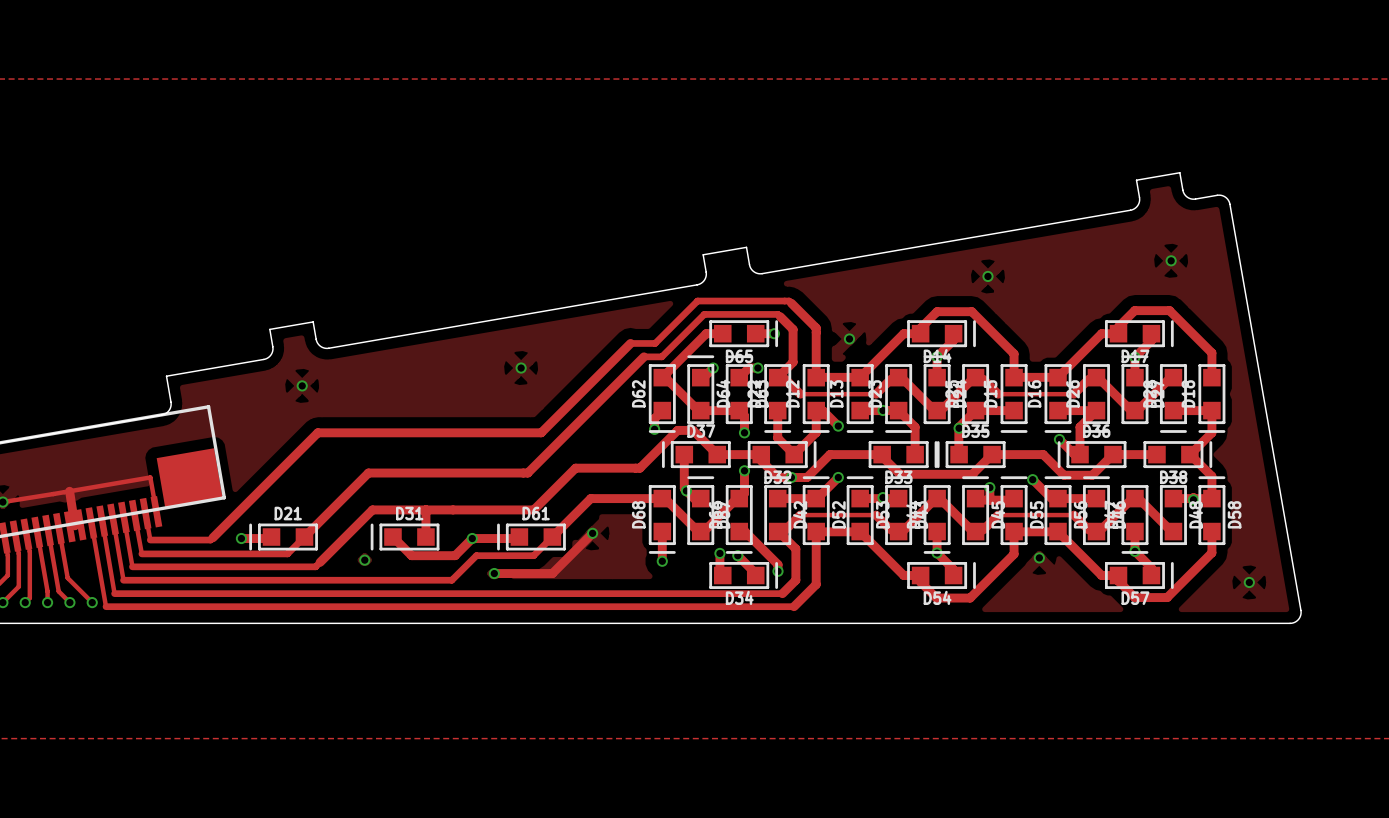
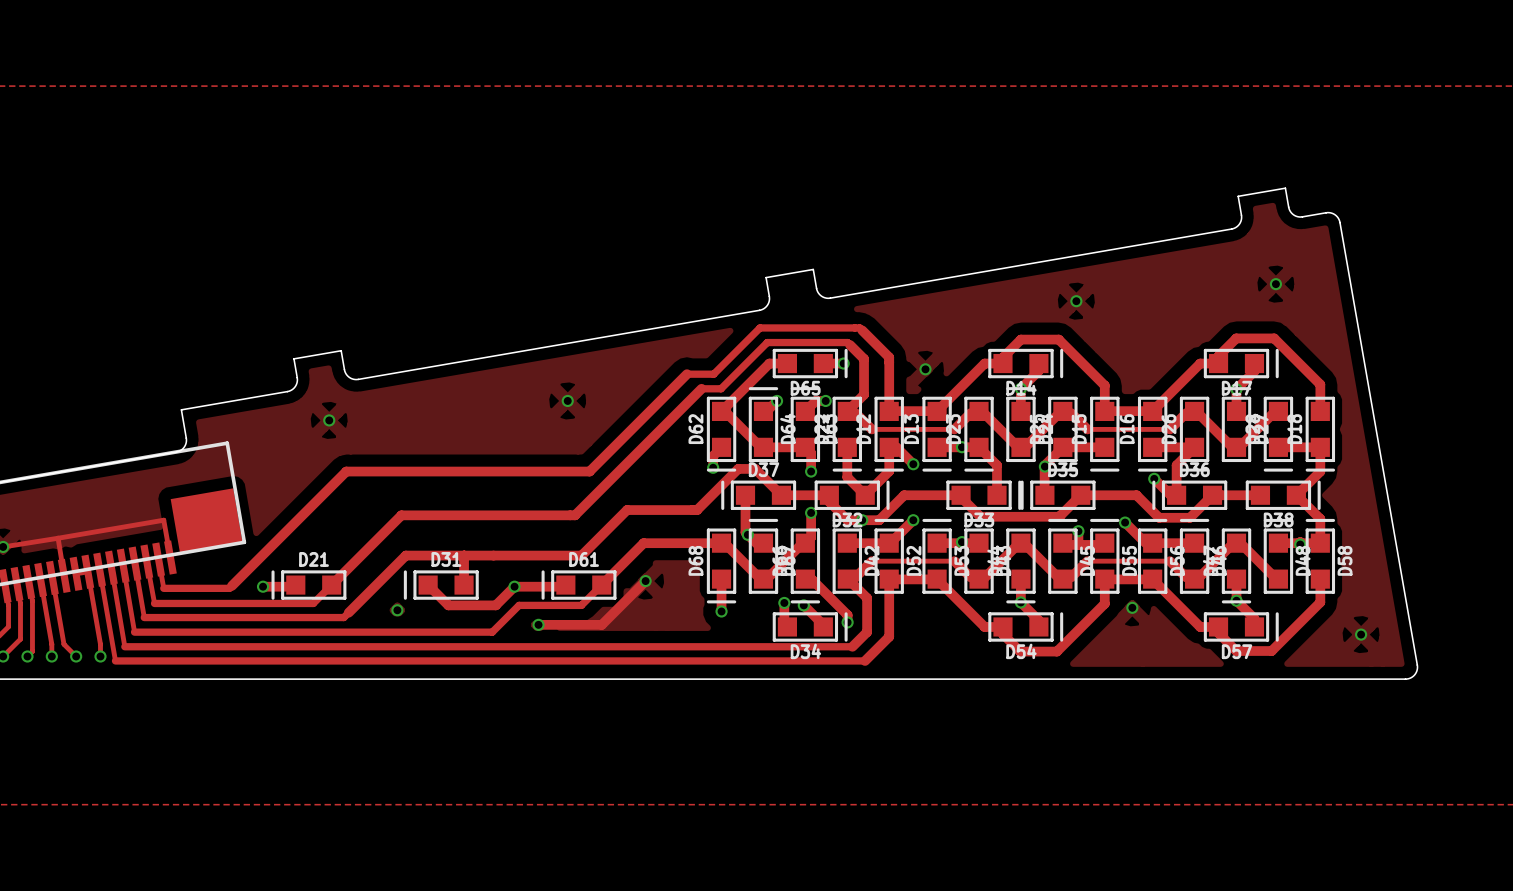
track: (69, 491) (74, 525) -> (58, 538) (64, 575)
track: (58, 528) (67, 578) (92, 602) -> (87, 571) (100, 644) (100, 656)

